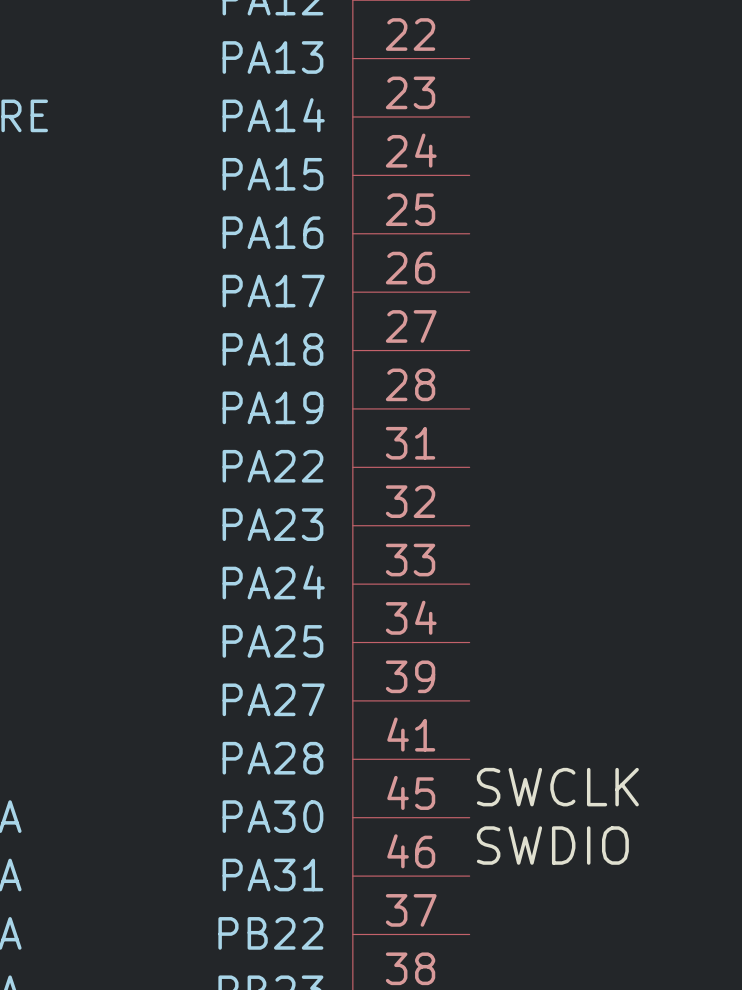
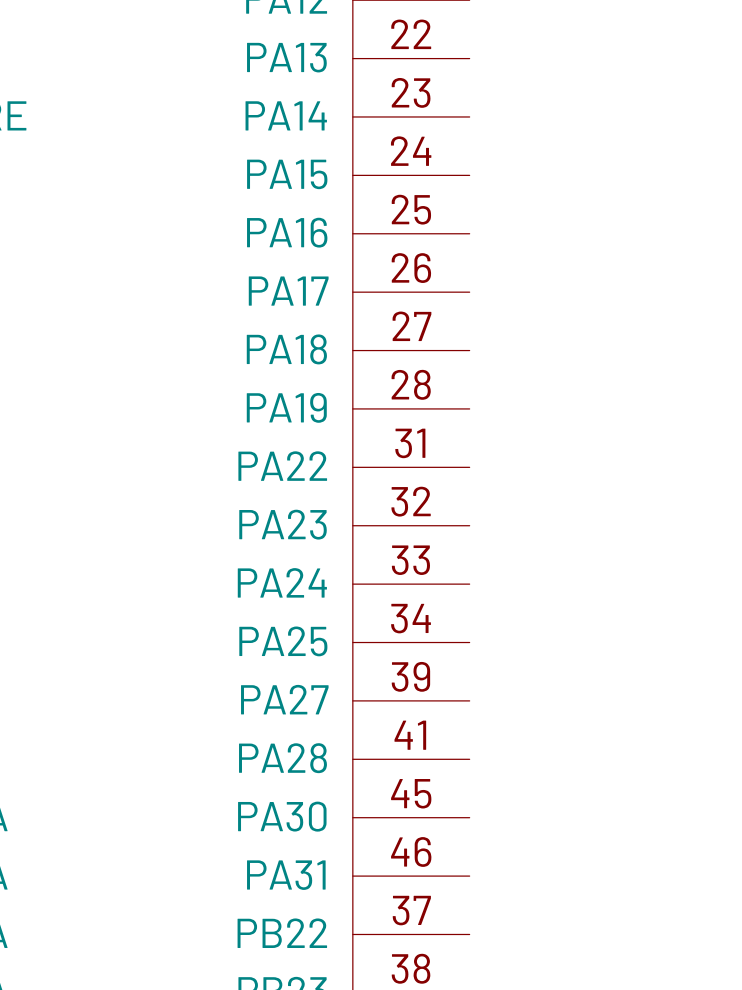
label: SWCLK (557, 787) -> none
label: SWDIO (552, 845) -> none

